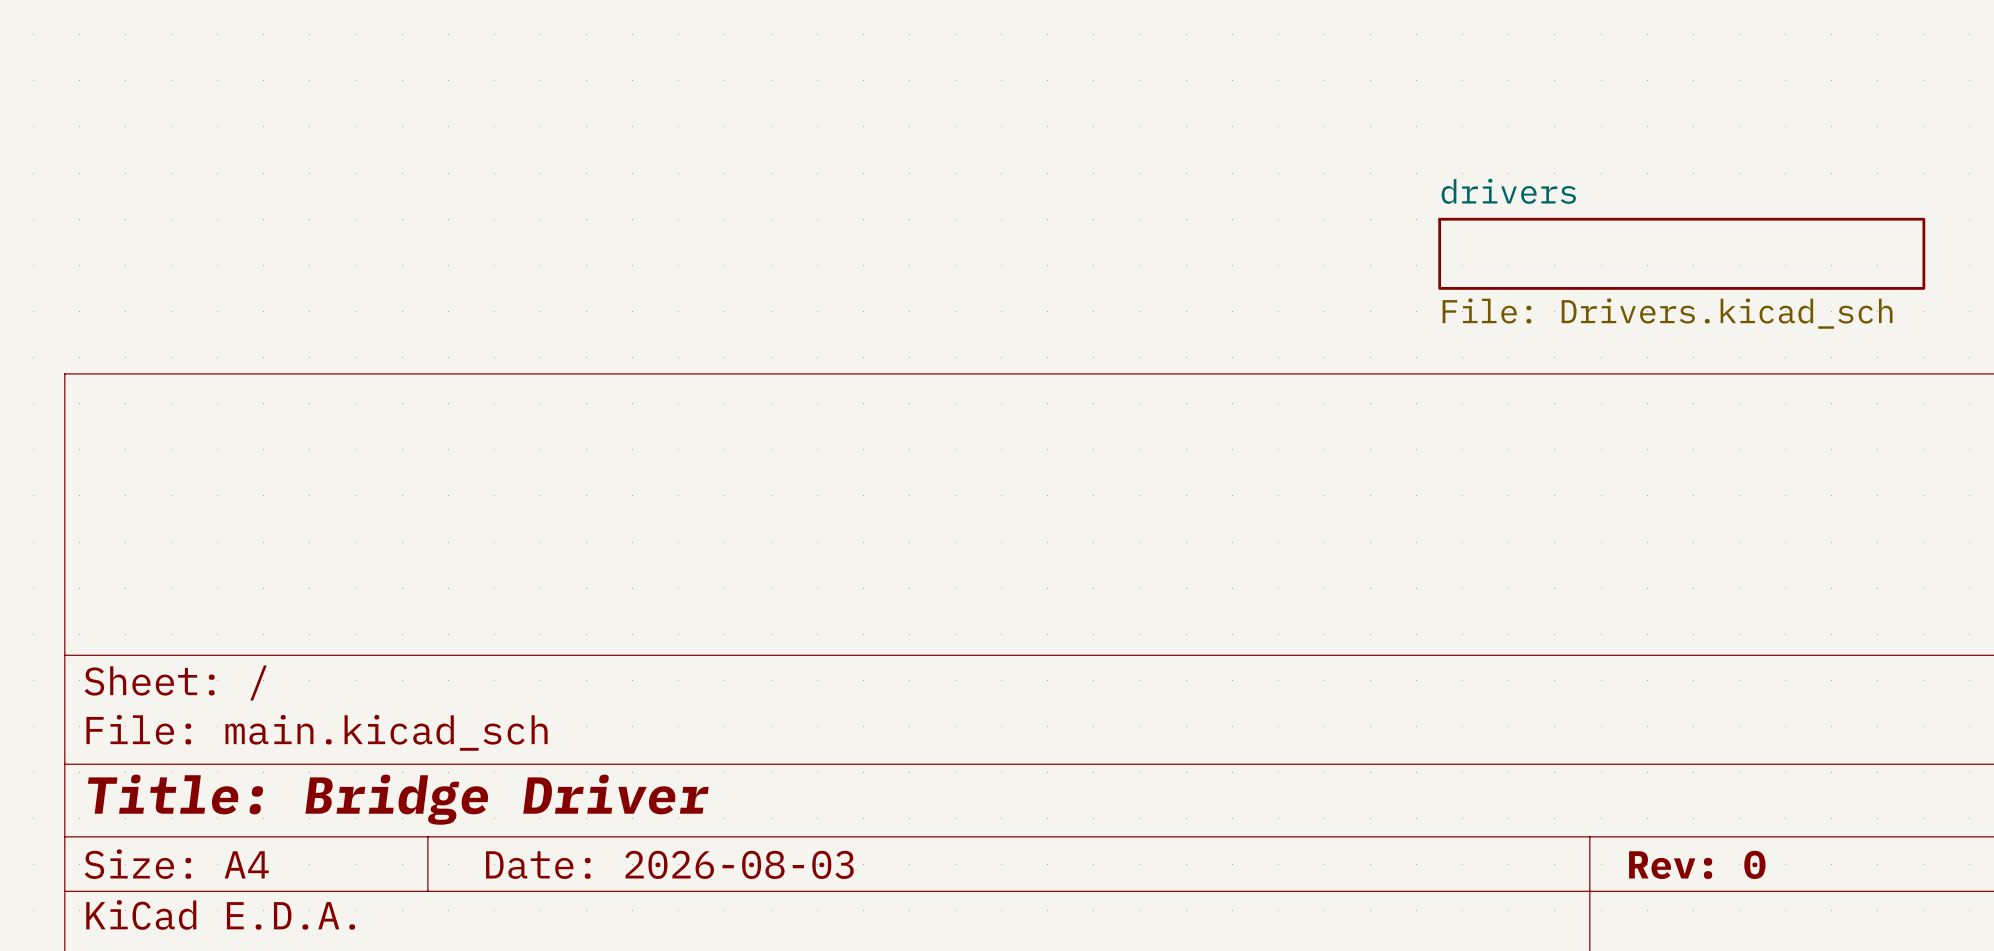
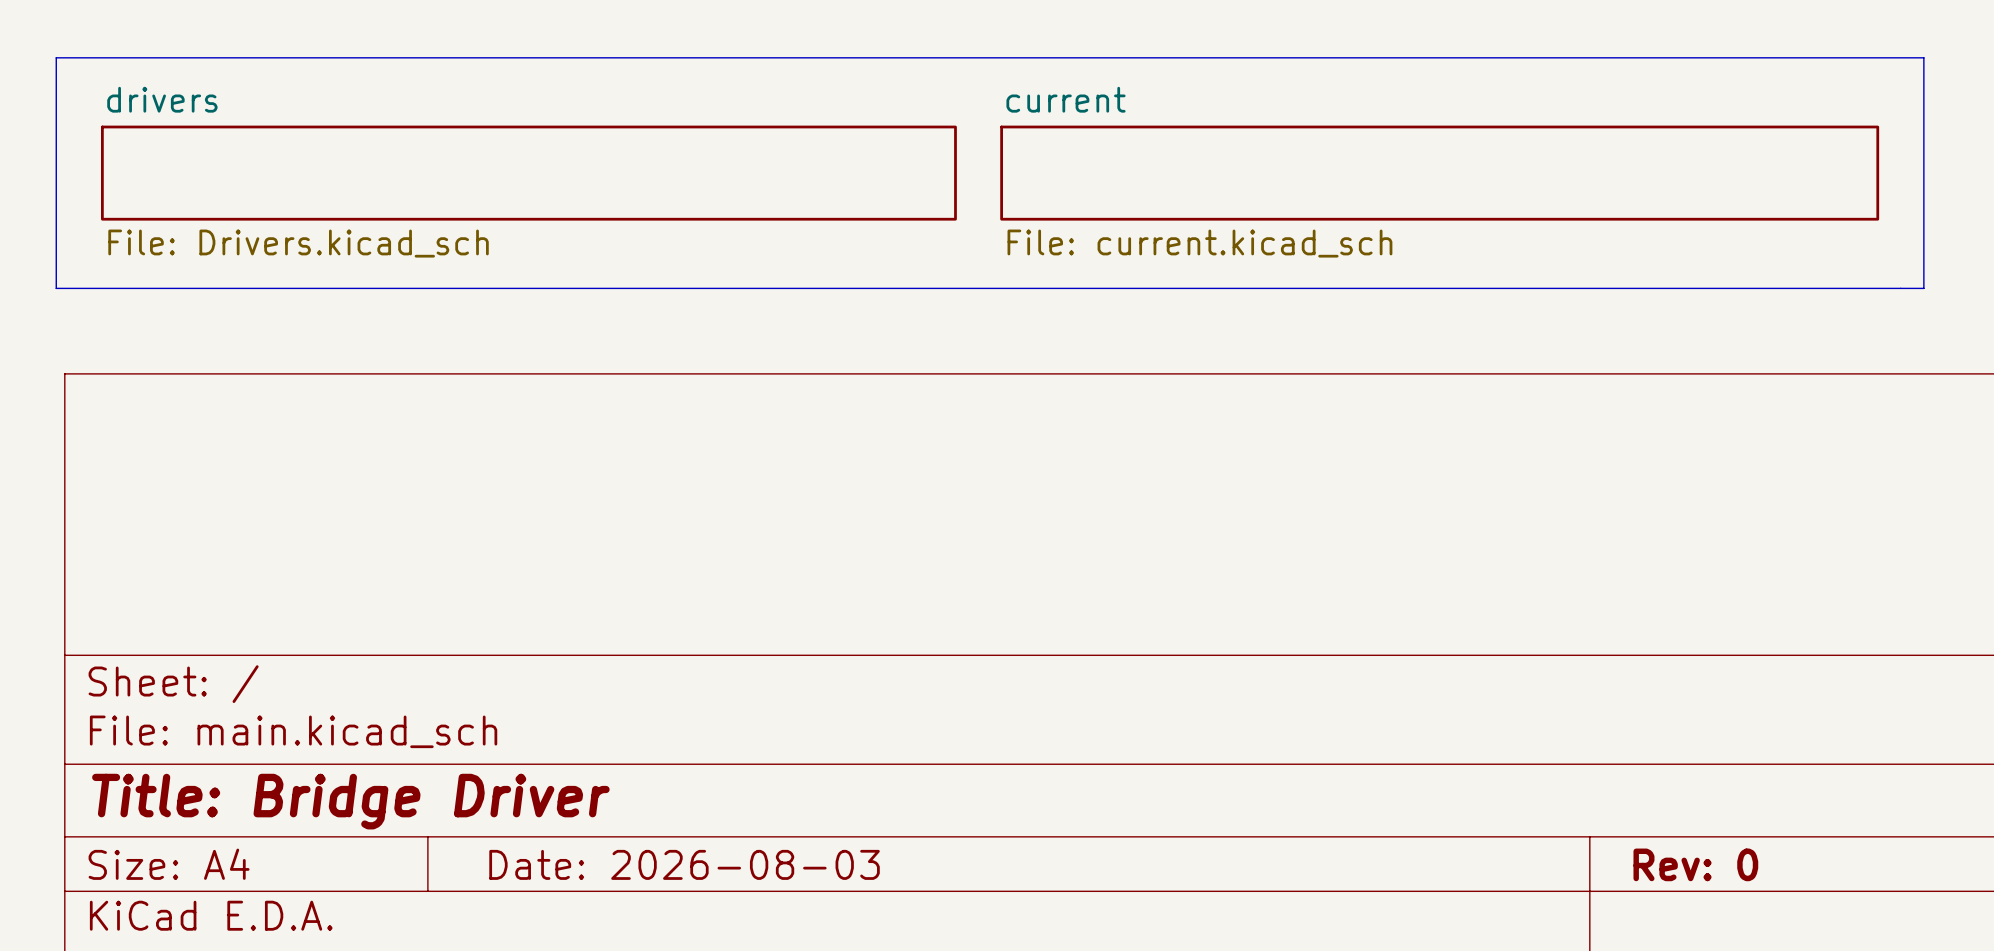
line: none -> (56, 57) (56, 288) (1923, 288) (1923, 57) (56, 57)
sheet drivers: none -> File: Drivers.kicad_sch (528, 173)
sheet current: none -> File: current.kicad_sch (1439, 173)
sheet drivers: File: Drivers.kicad_sch (1681, 253) -> none

